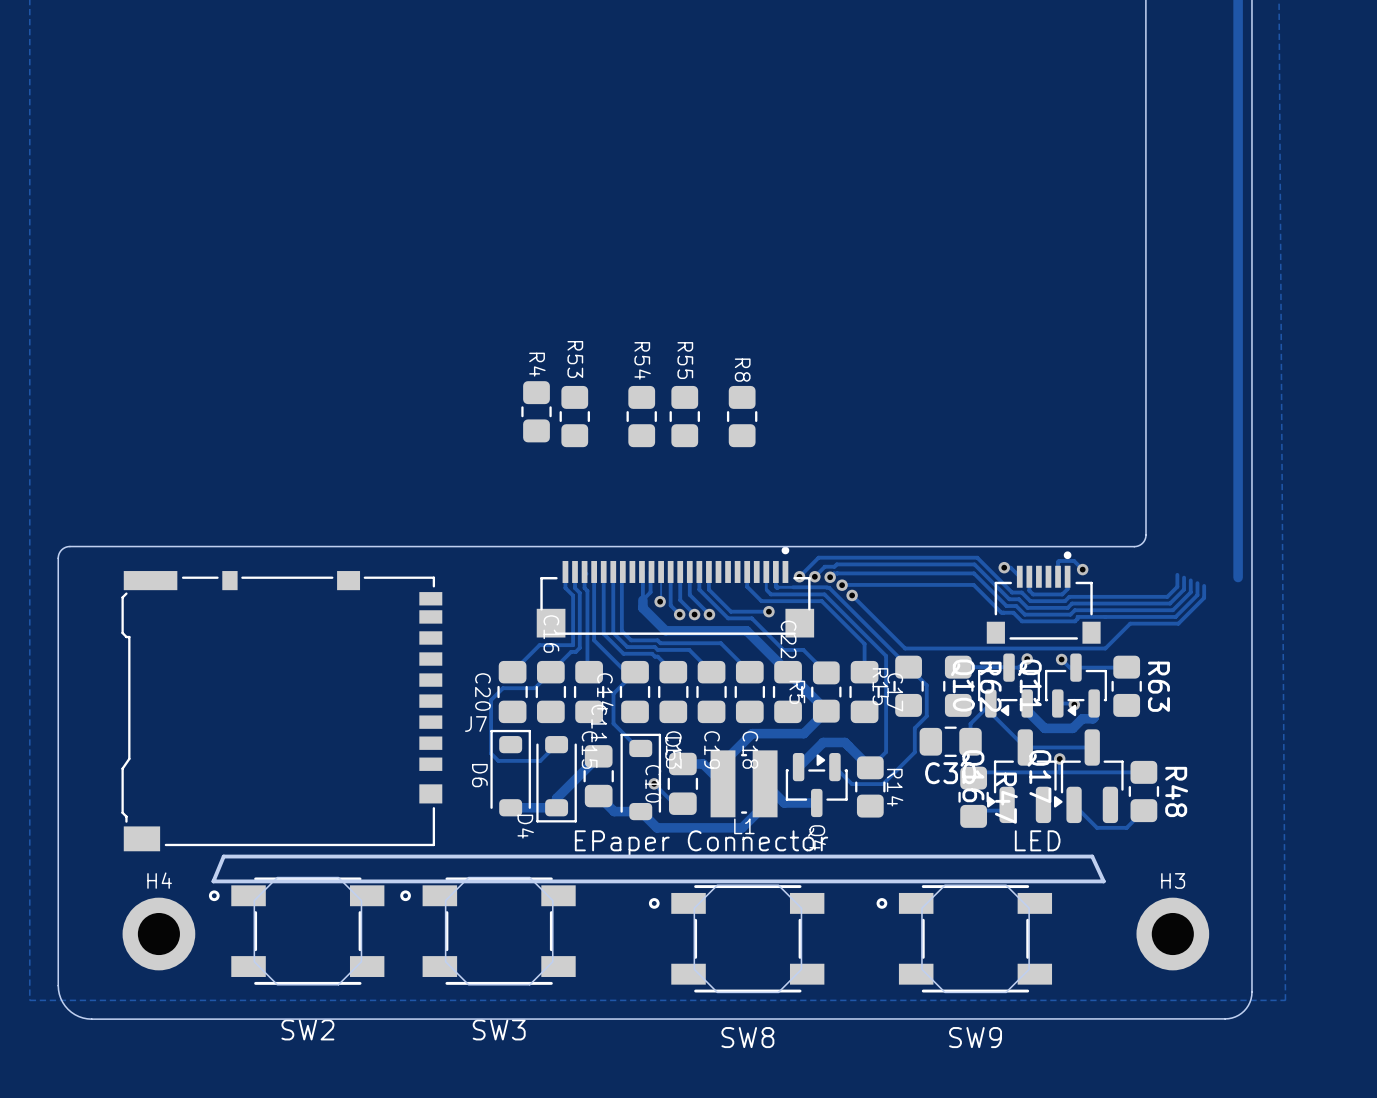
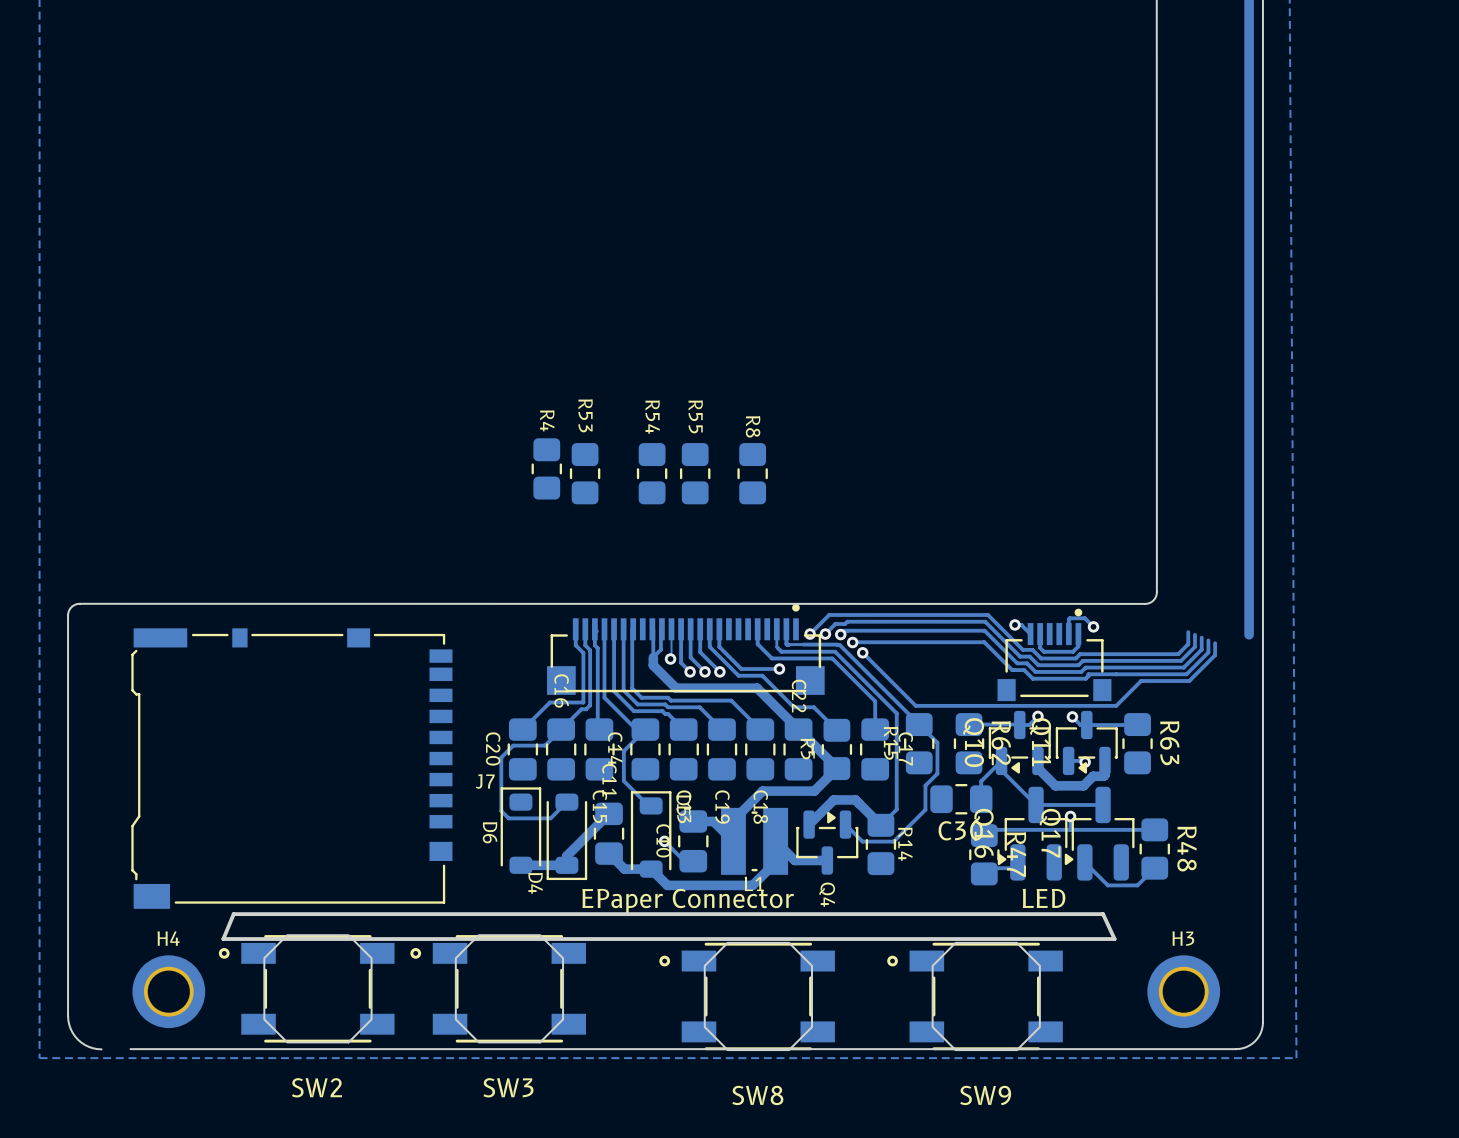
board edge: (58, 957) (58, 990) (62, 1002) (74, 1014) (91, 1019) (1225, 1018) (1238, 1015) (1248, 1005) (1251, 995) (1251, 964) -> (130, 1049) (1236, 1049) (1246, 1047) (1255, 1041) (1260, 1032) (1262, 1022)
board edge: none -> (68, 1015) (70, 1028) (77, 1039) (88, 1046) (101, 1049)

